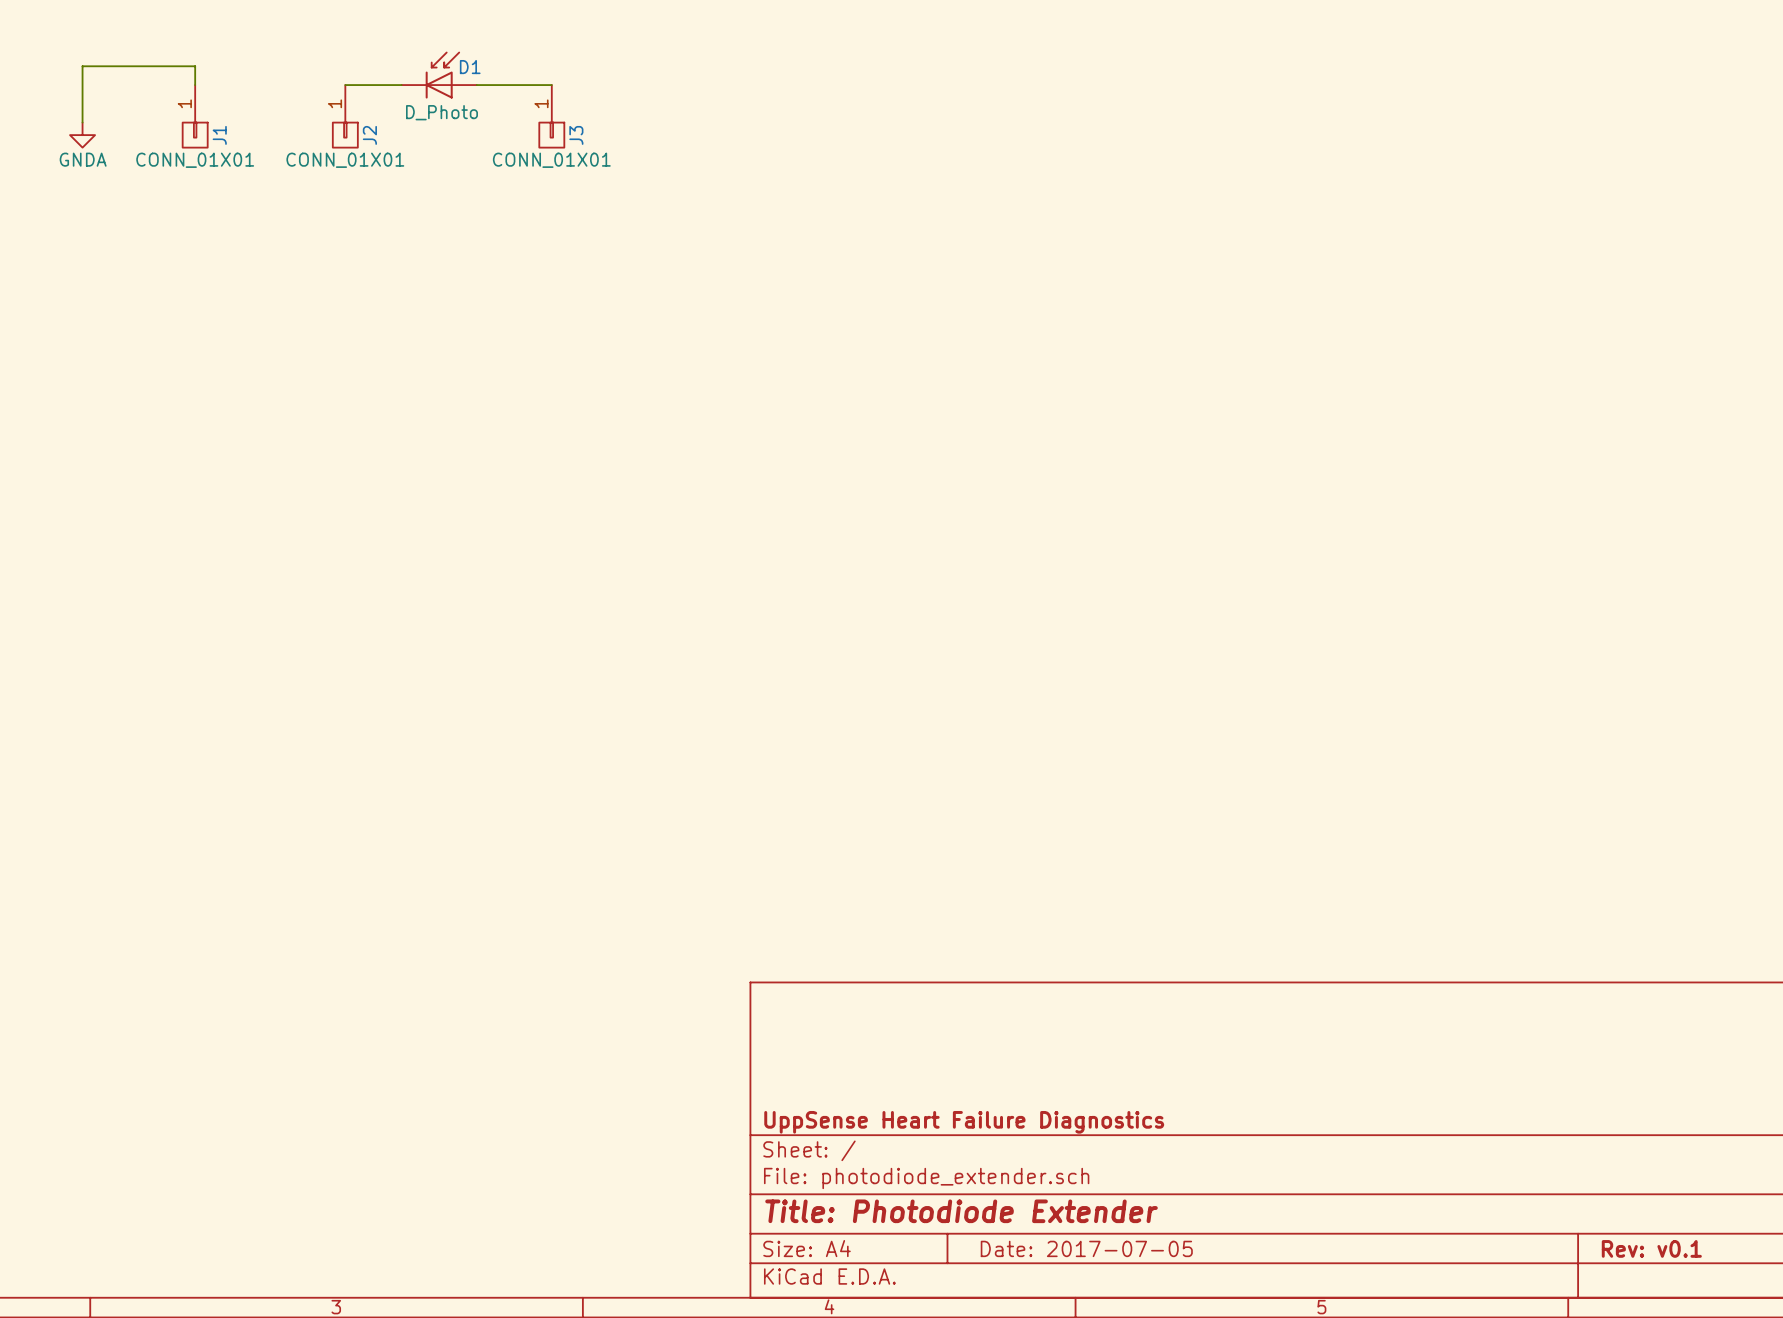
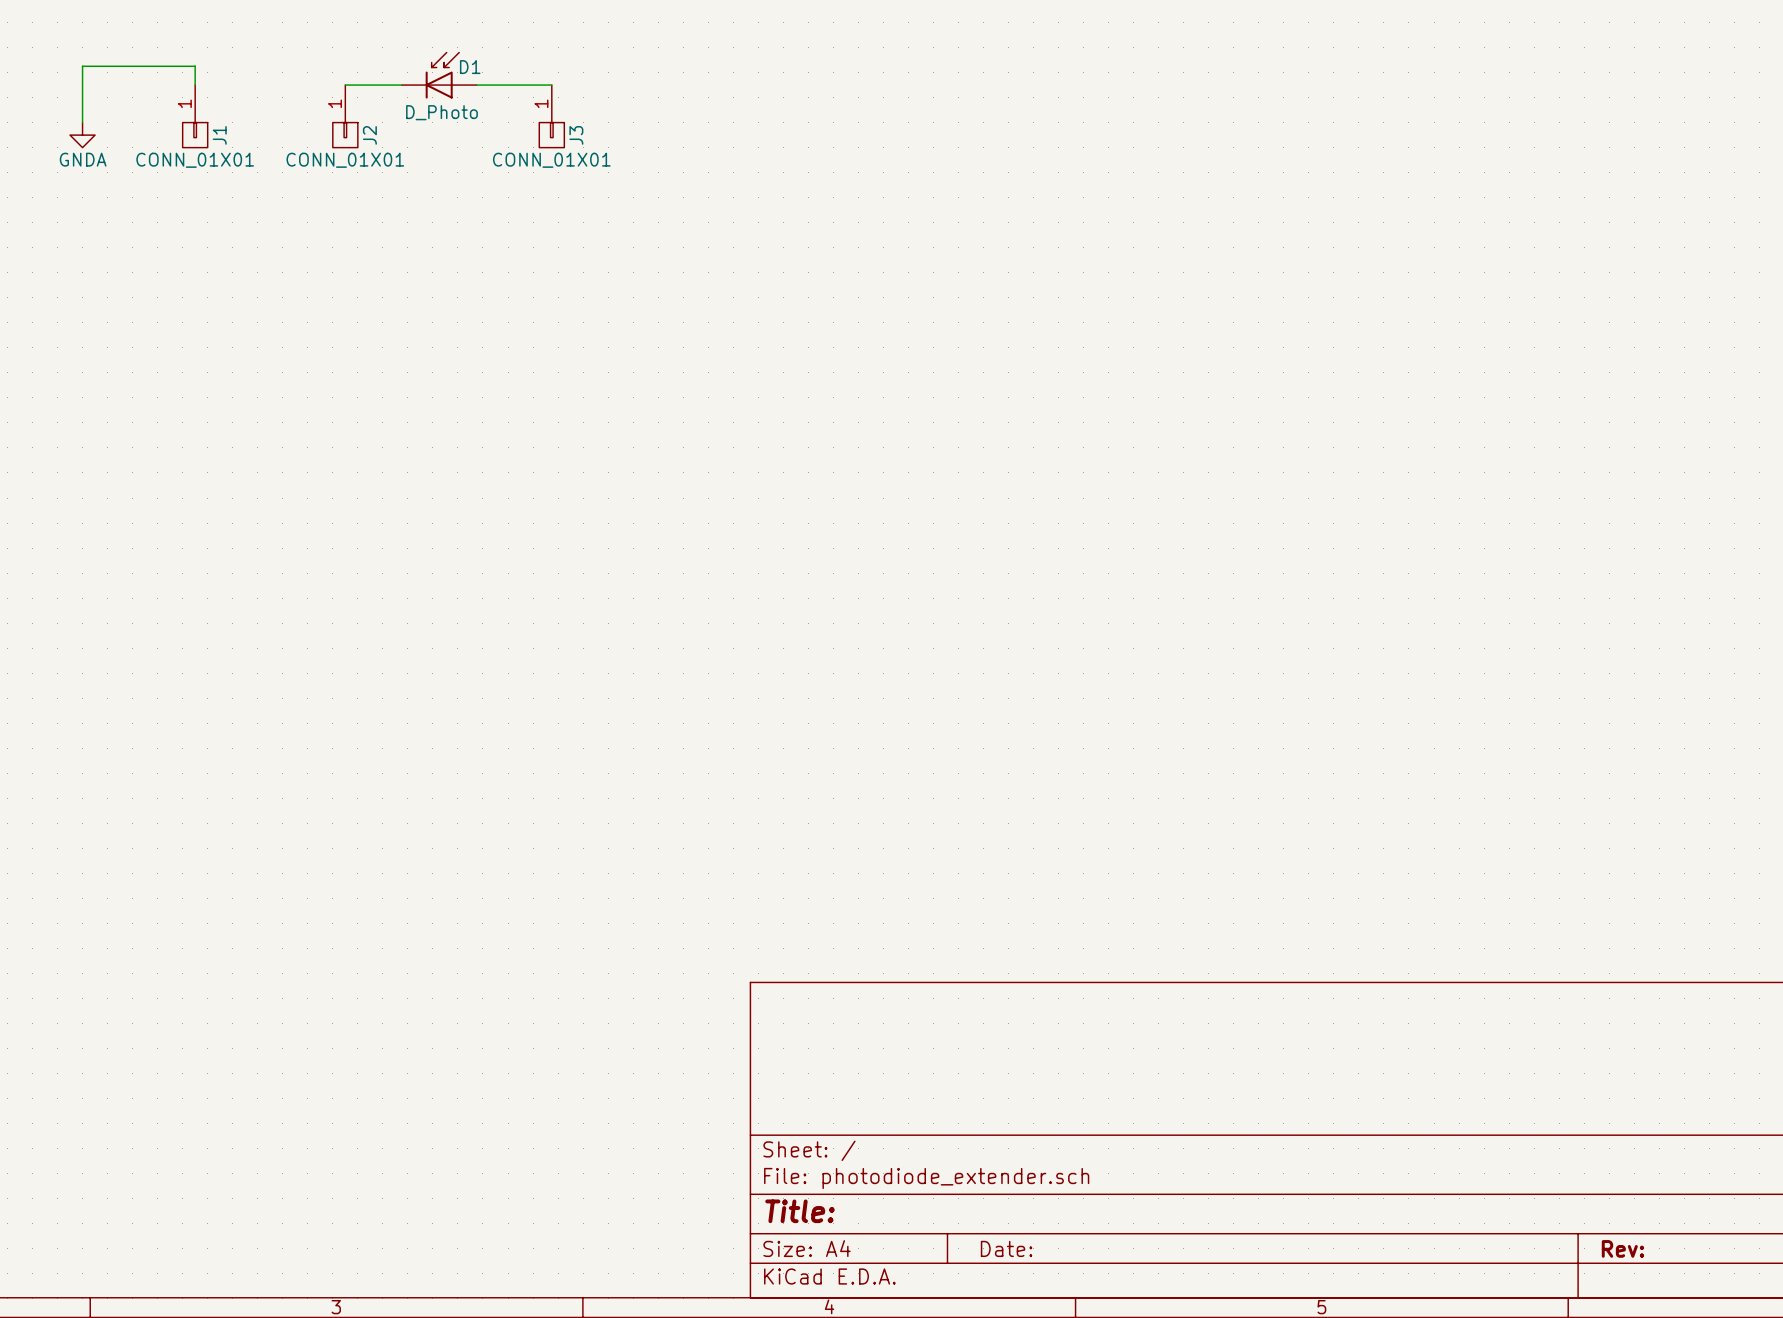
title block: UppSense Heart Failure Diagnostics (964, 1122) -> none
title block: Title: Photodiode Extender (961, 1211) -> Title: (799, 1211)
title block: Date: 2017-07-05 (1086, 1248) -> Date: (1006, 1248)
title block: Rev: v0.1 (1651, 1248) -> Rev: (1622, 1248)

